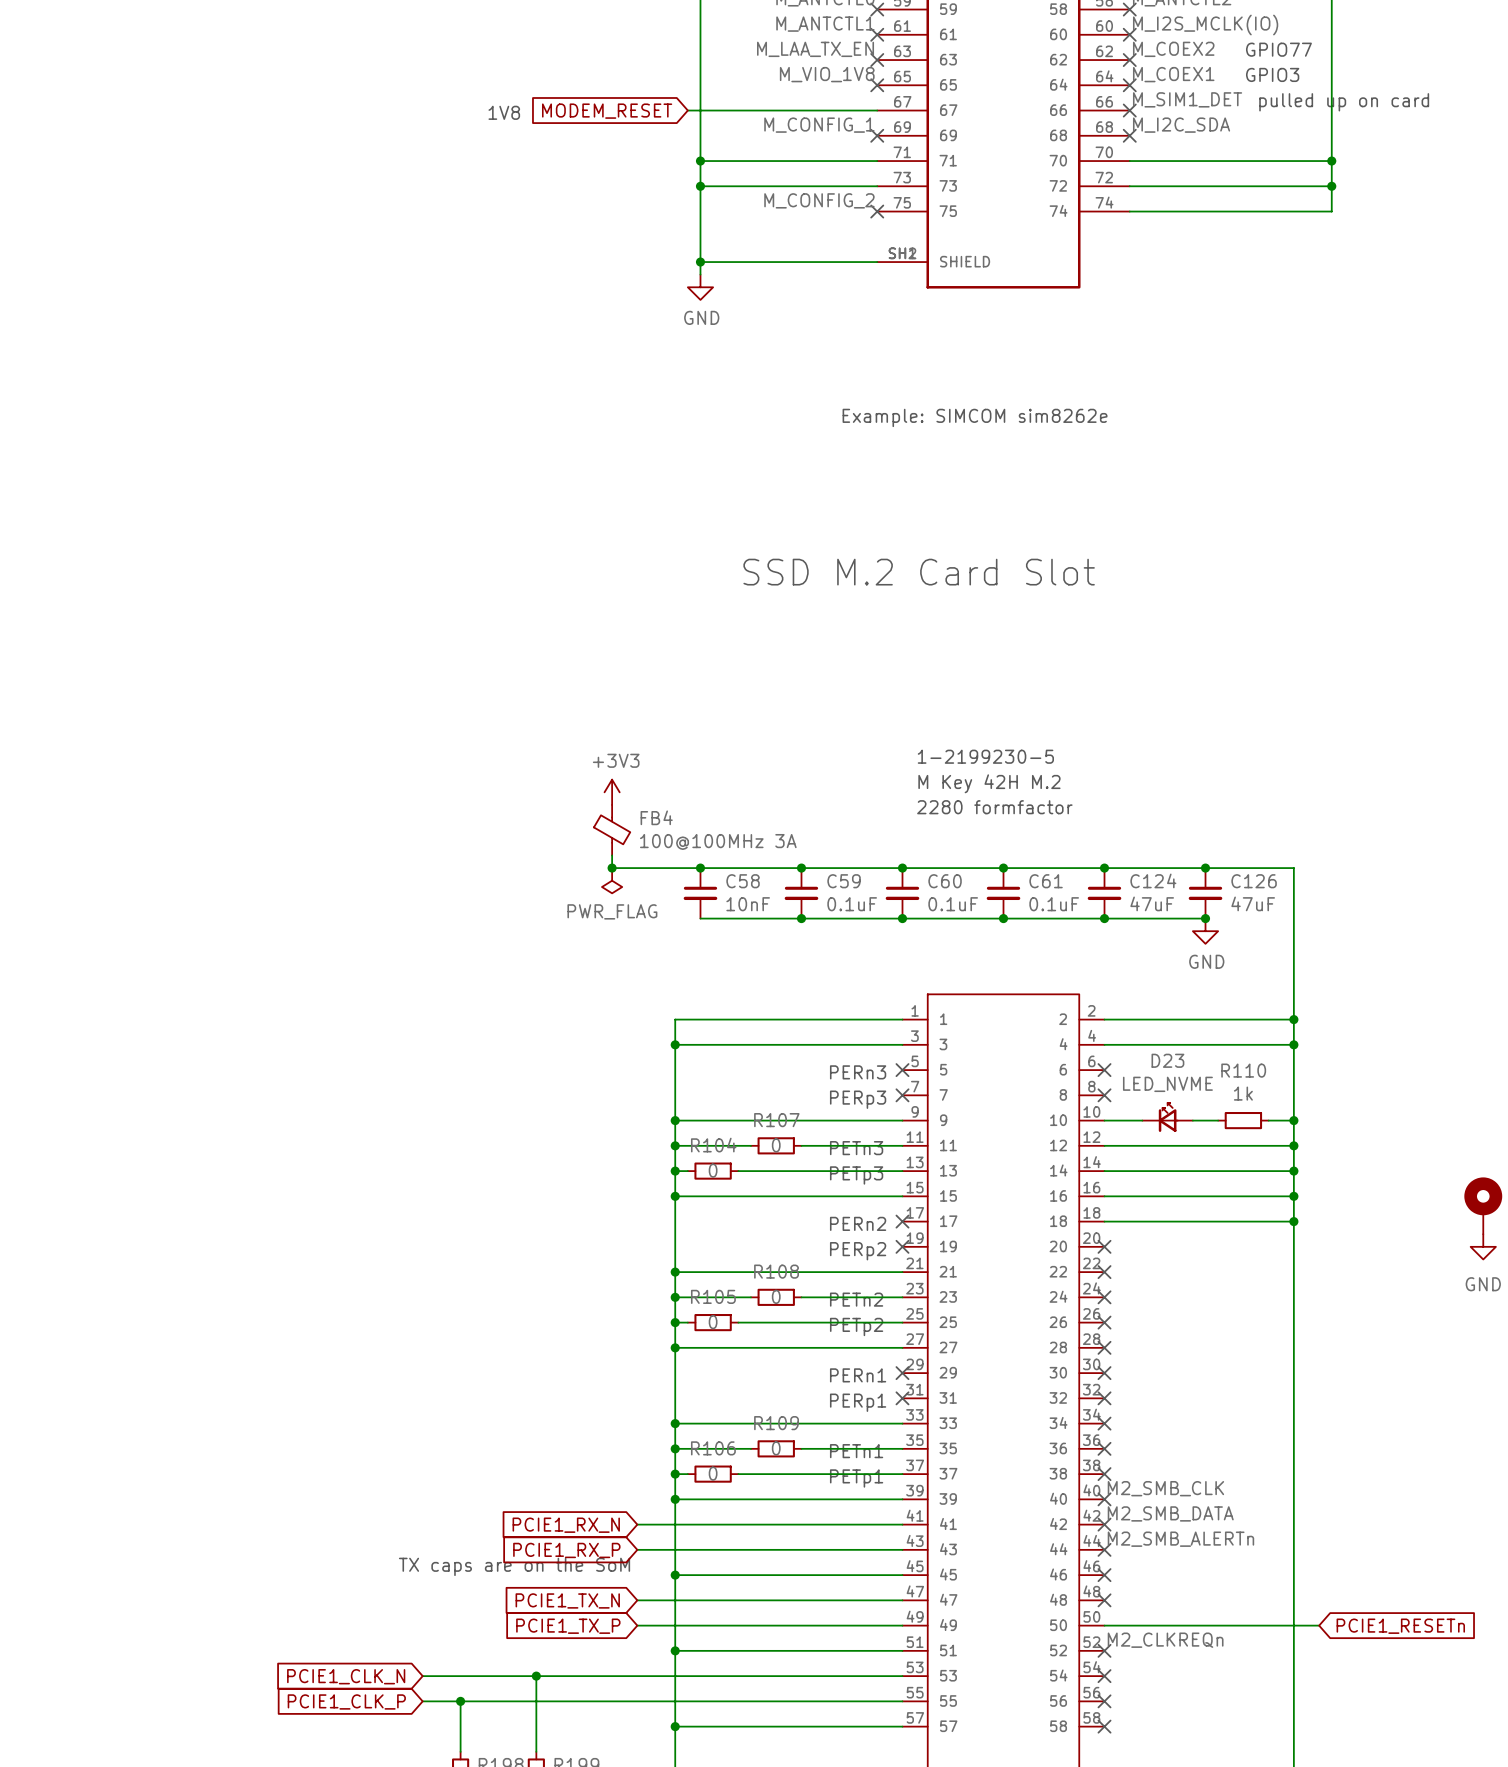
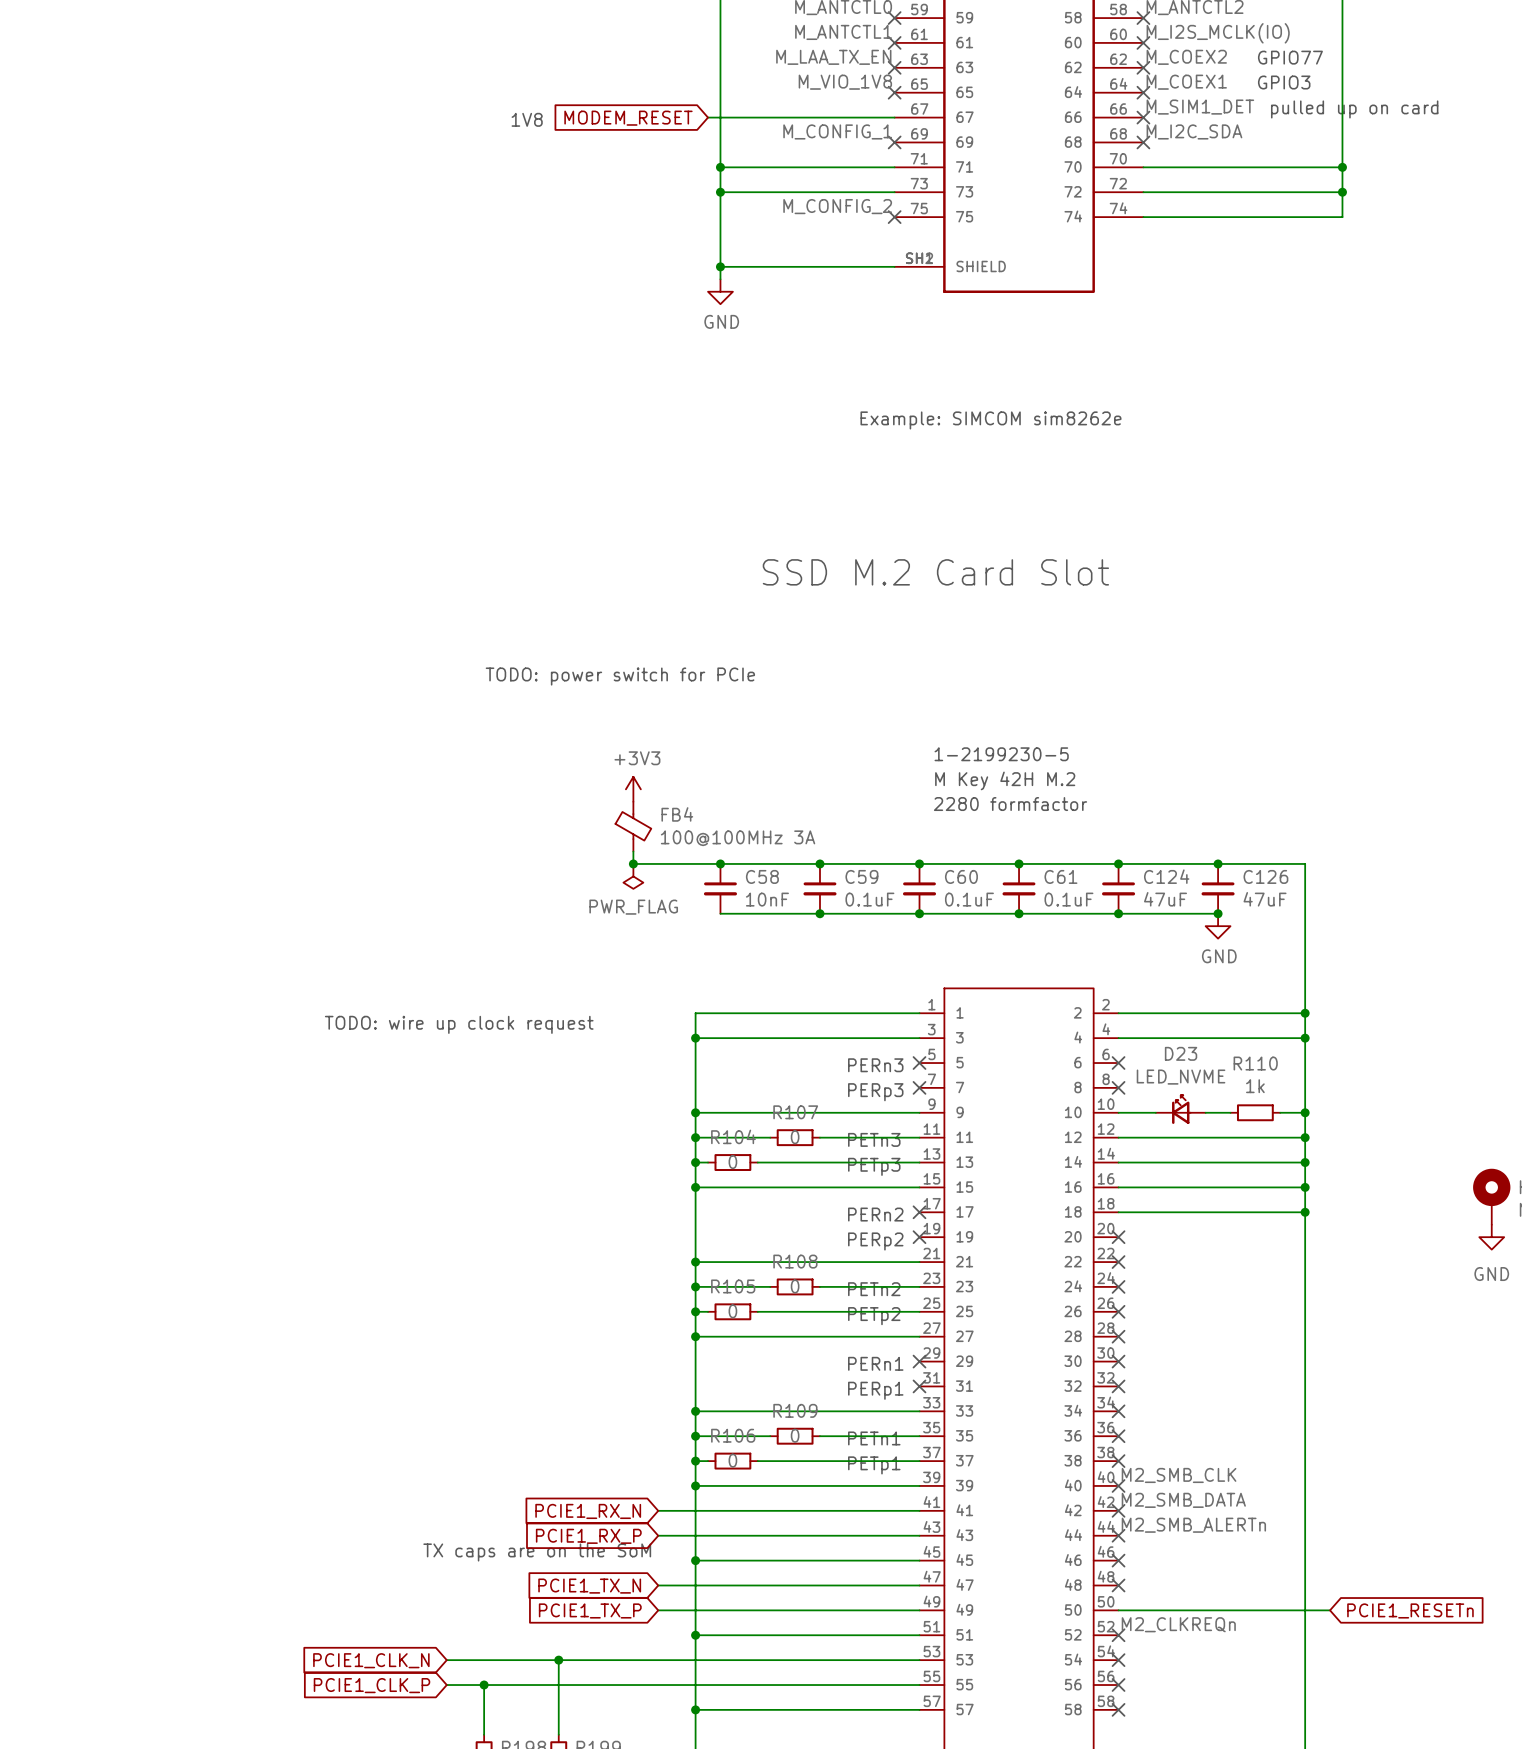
text: none -> TODO: power switch for PCIe (620, 676)
text: none -> TODO: wire up clock request (459, 1024)

